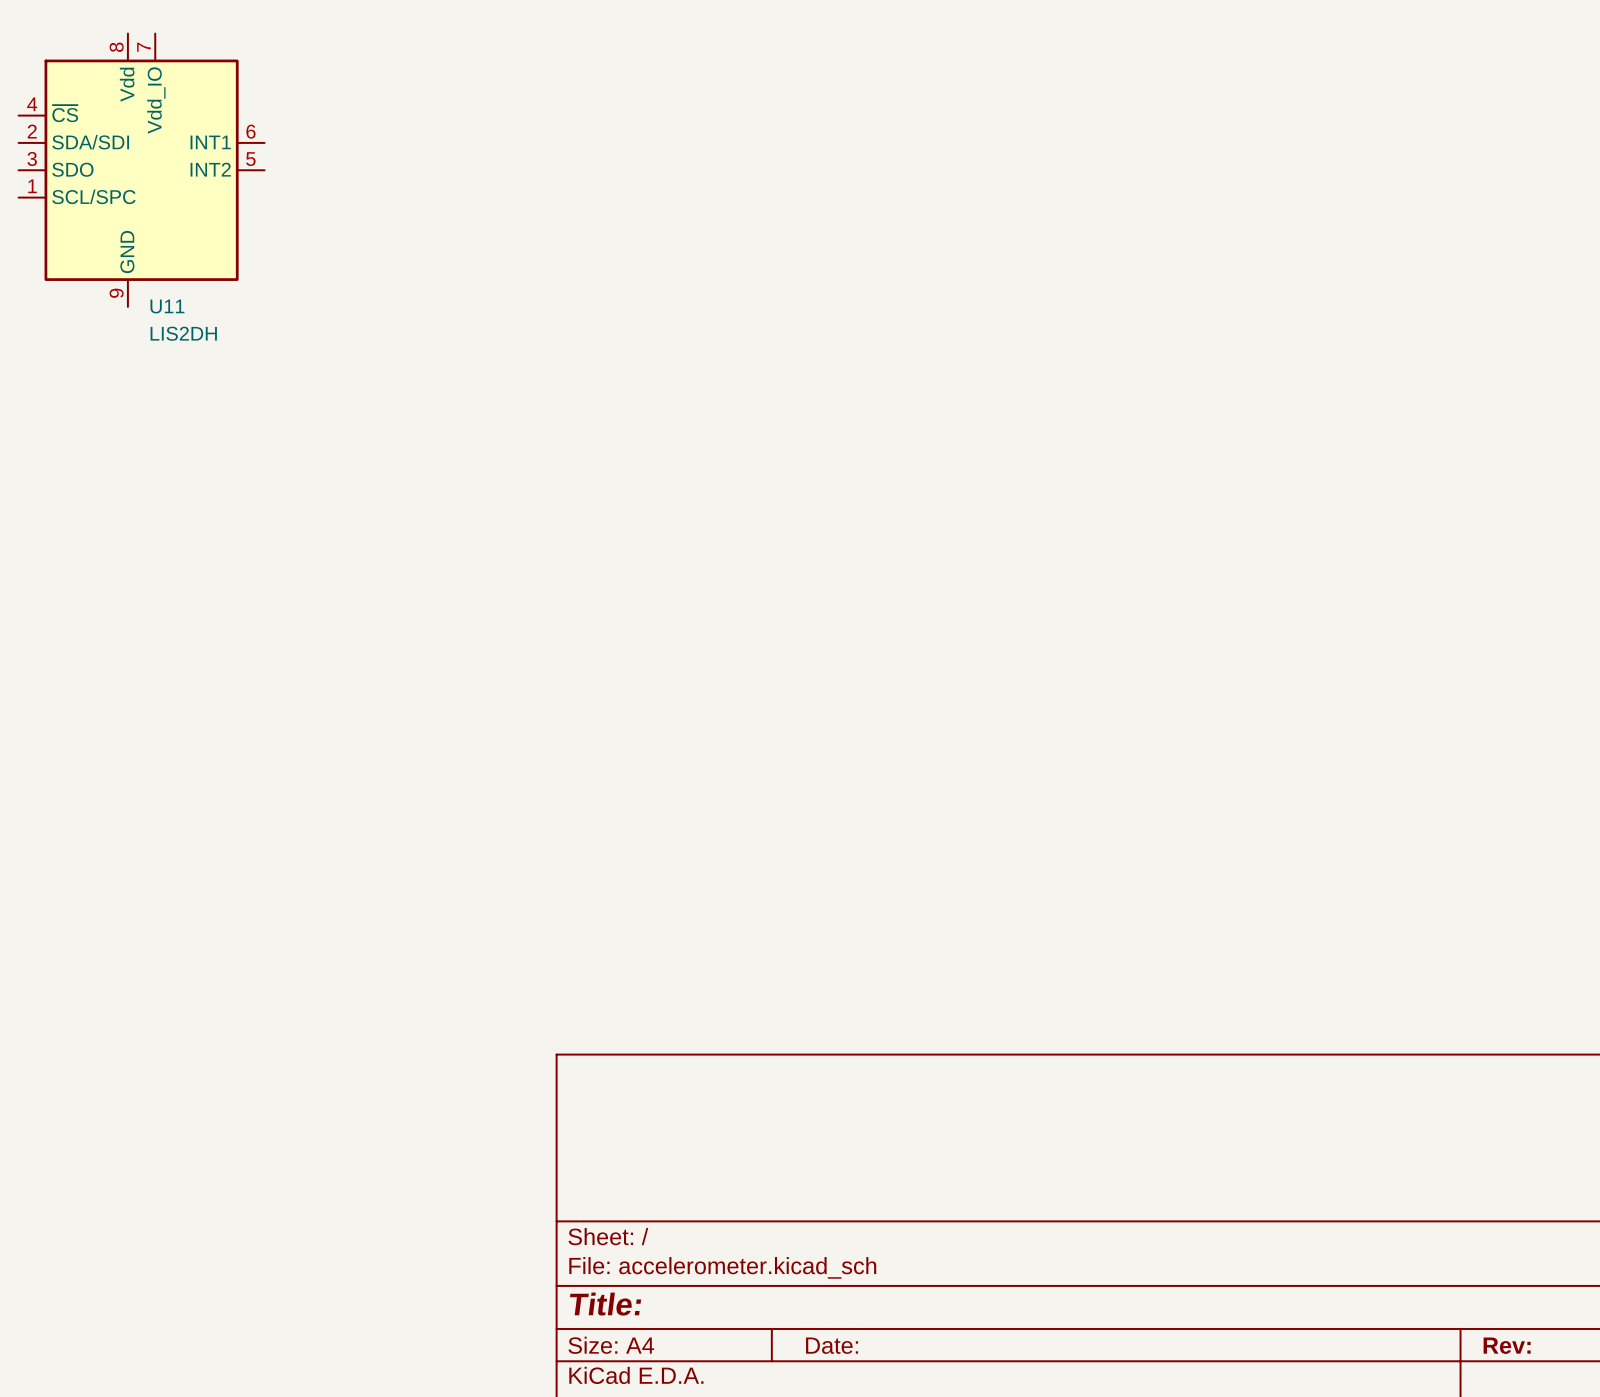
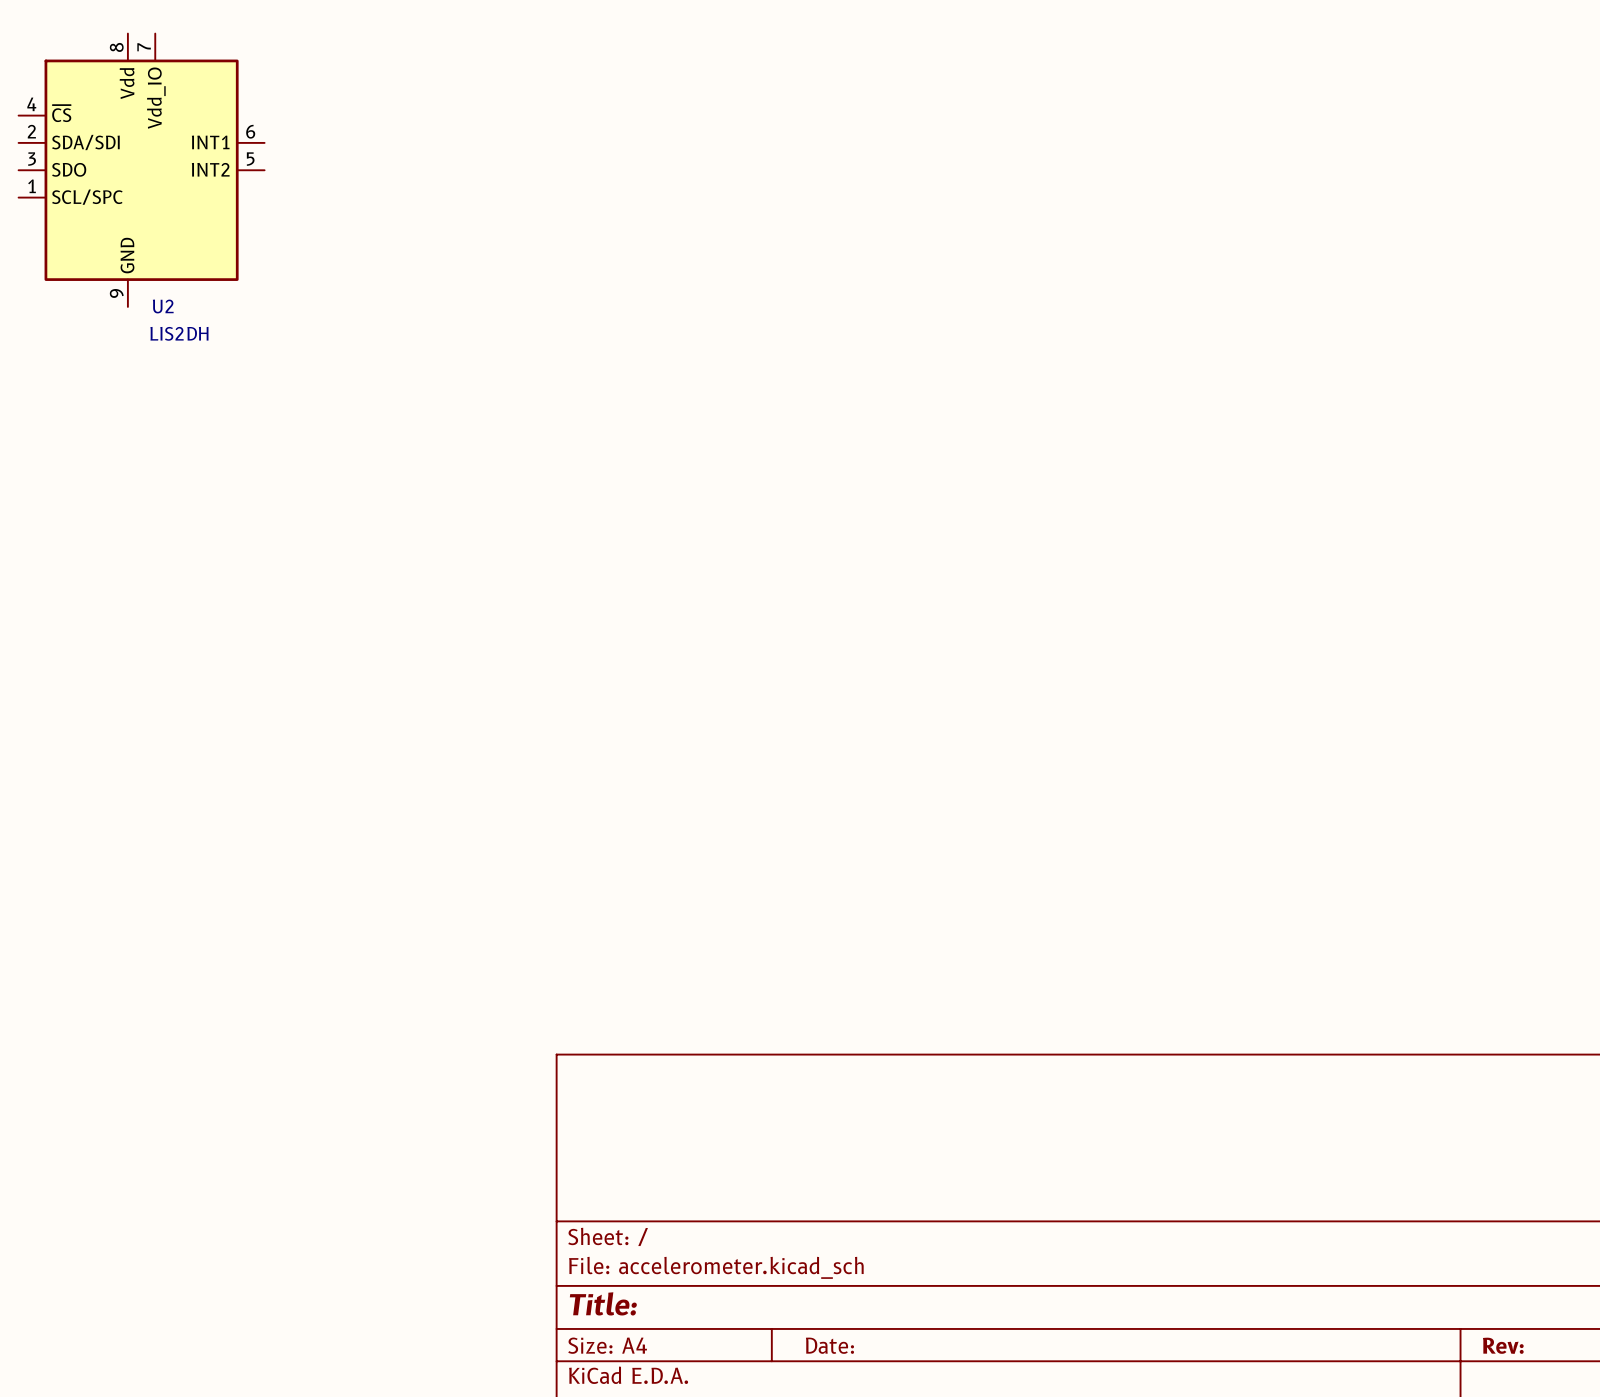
U11 name: U11 (167, 306) -> U2 (163, 306)

